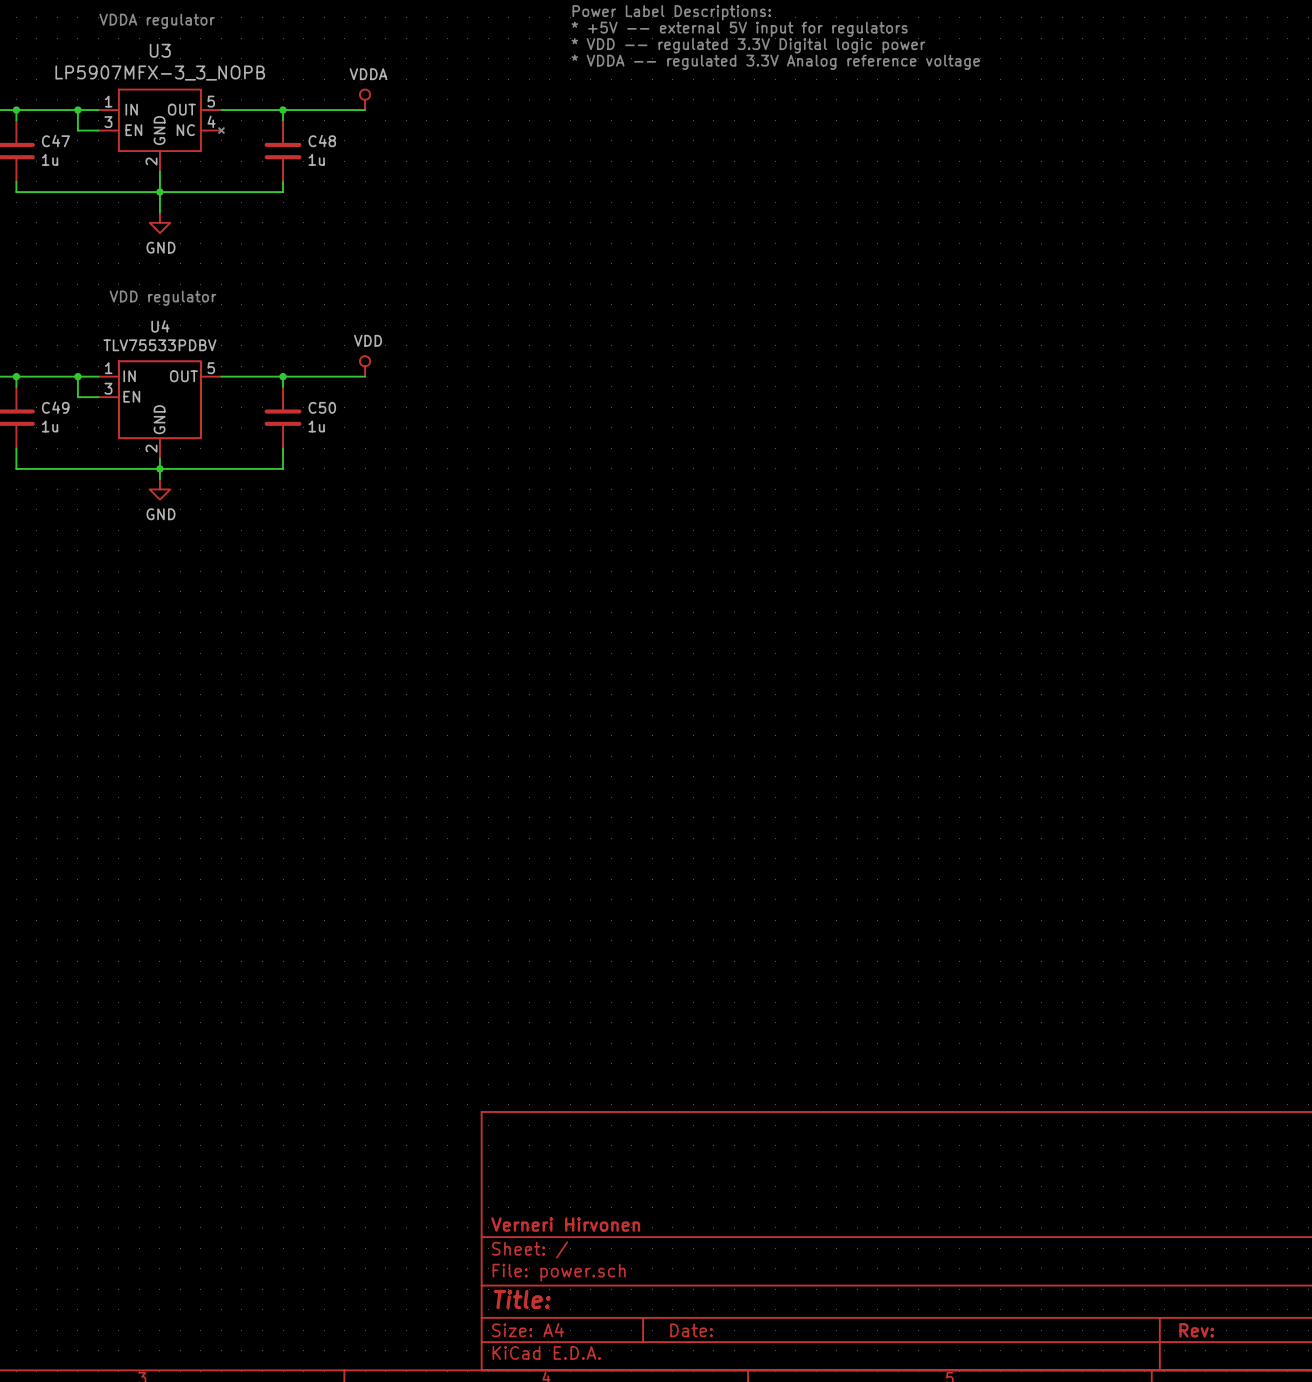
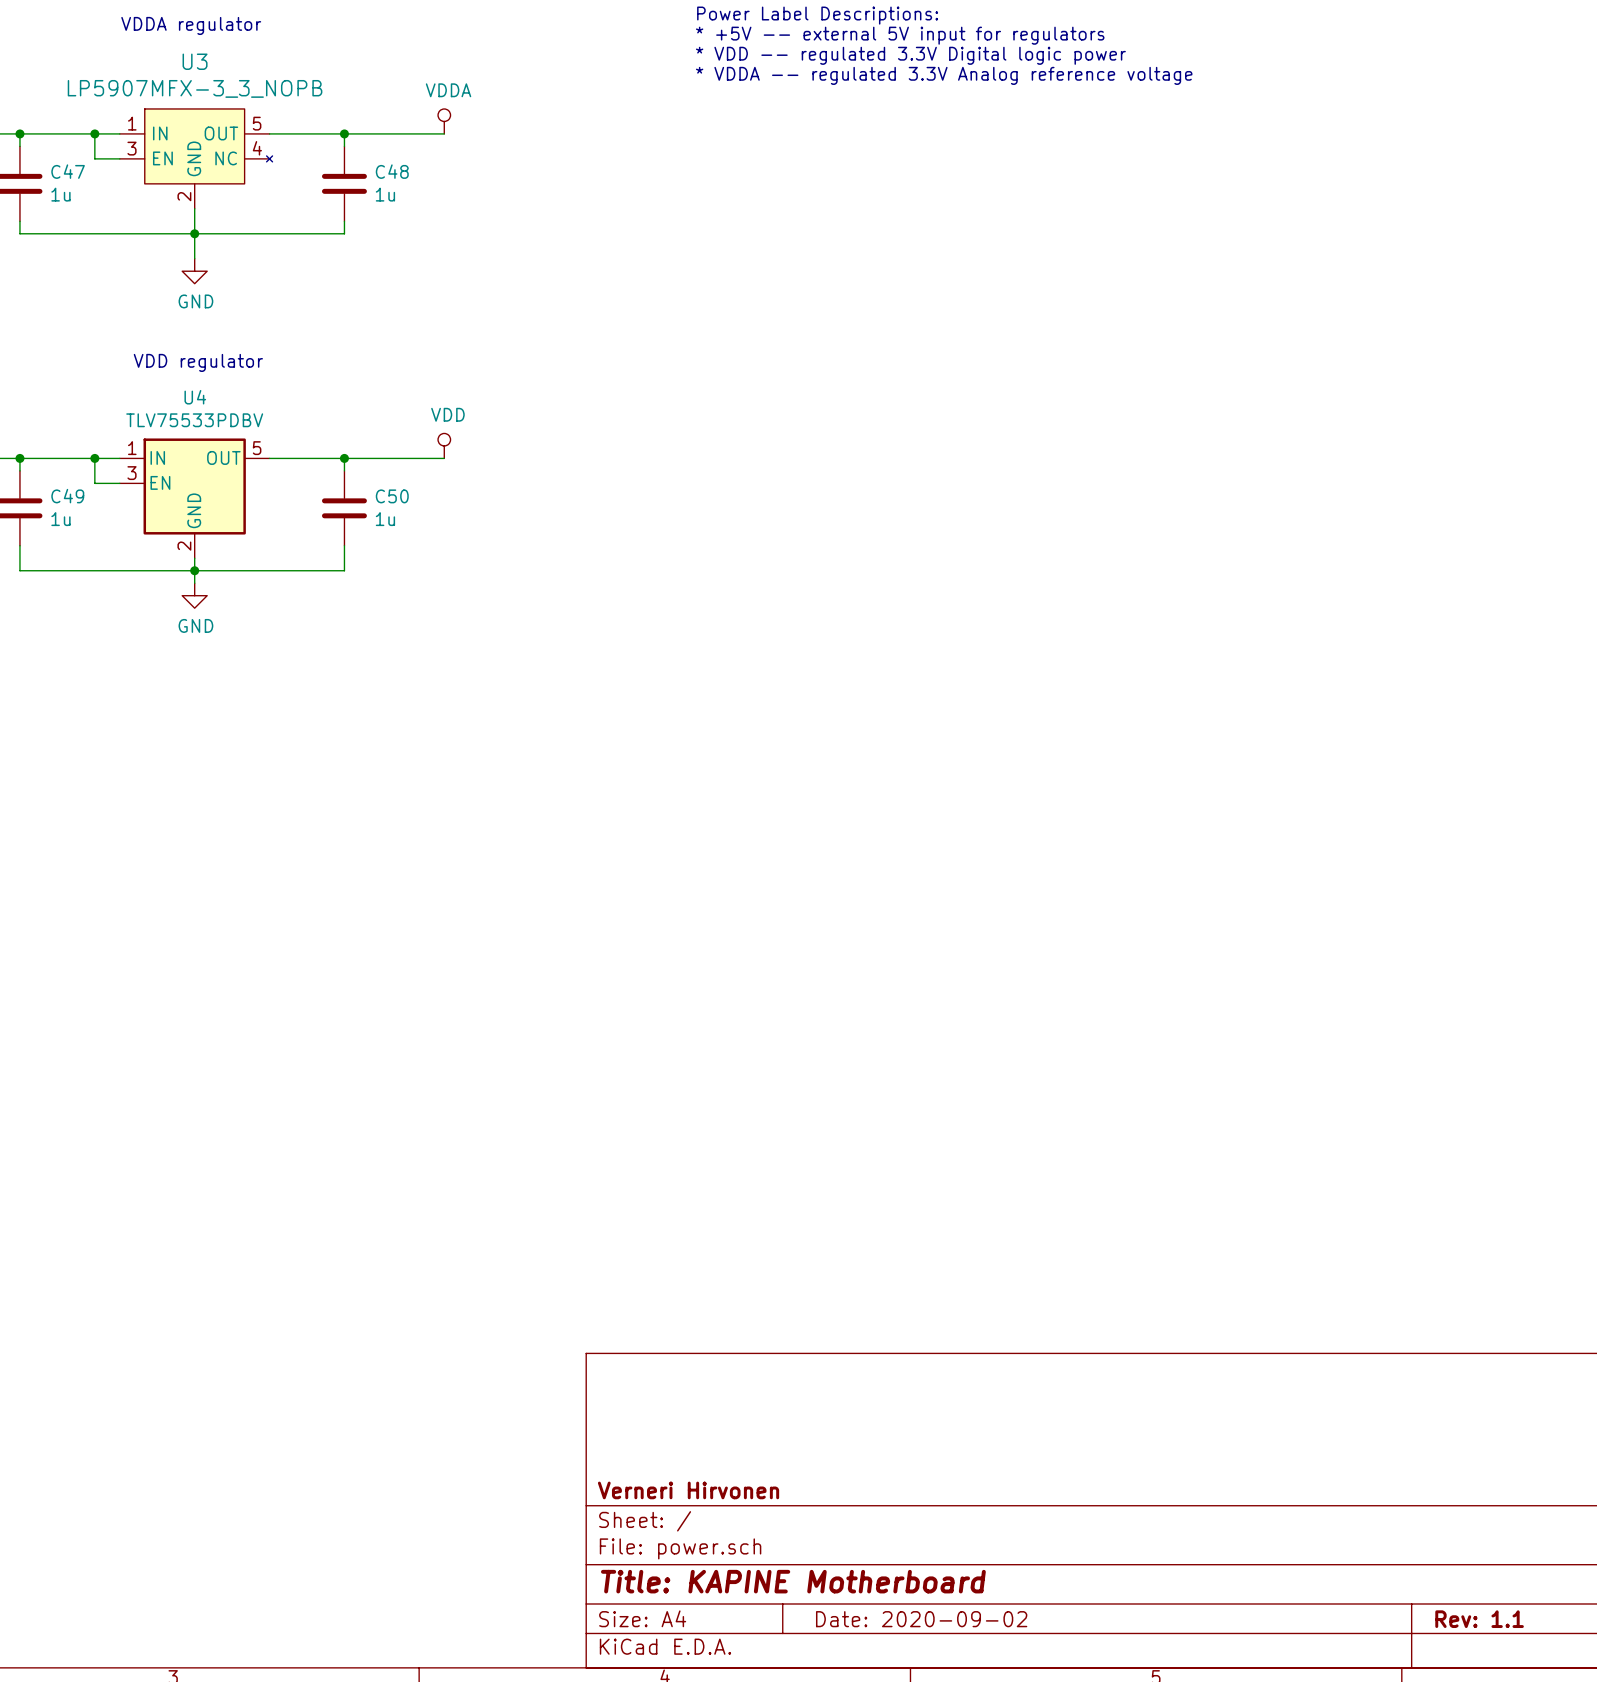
title block: Title: (522, 1299) -> Title: KAPINE Motherboard (793, 1581)
title block: Date: (691, 1330) -> Date: 2020-09-02 (921, 1619)
title block: Rev: (1196, 1330) -> Rev: 1.1 (1479, 1619)

